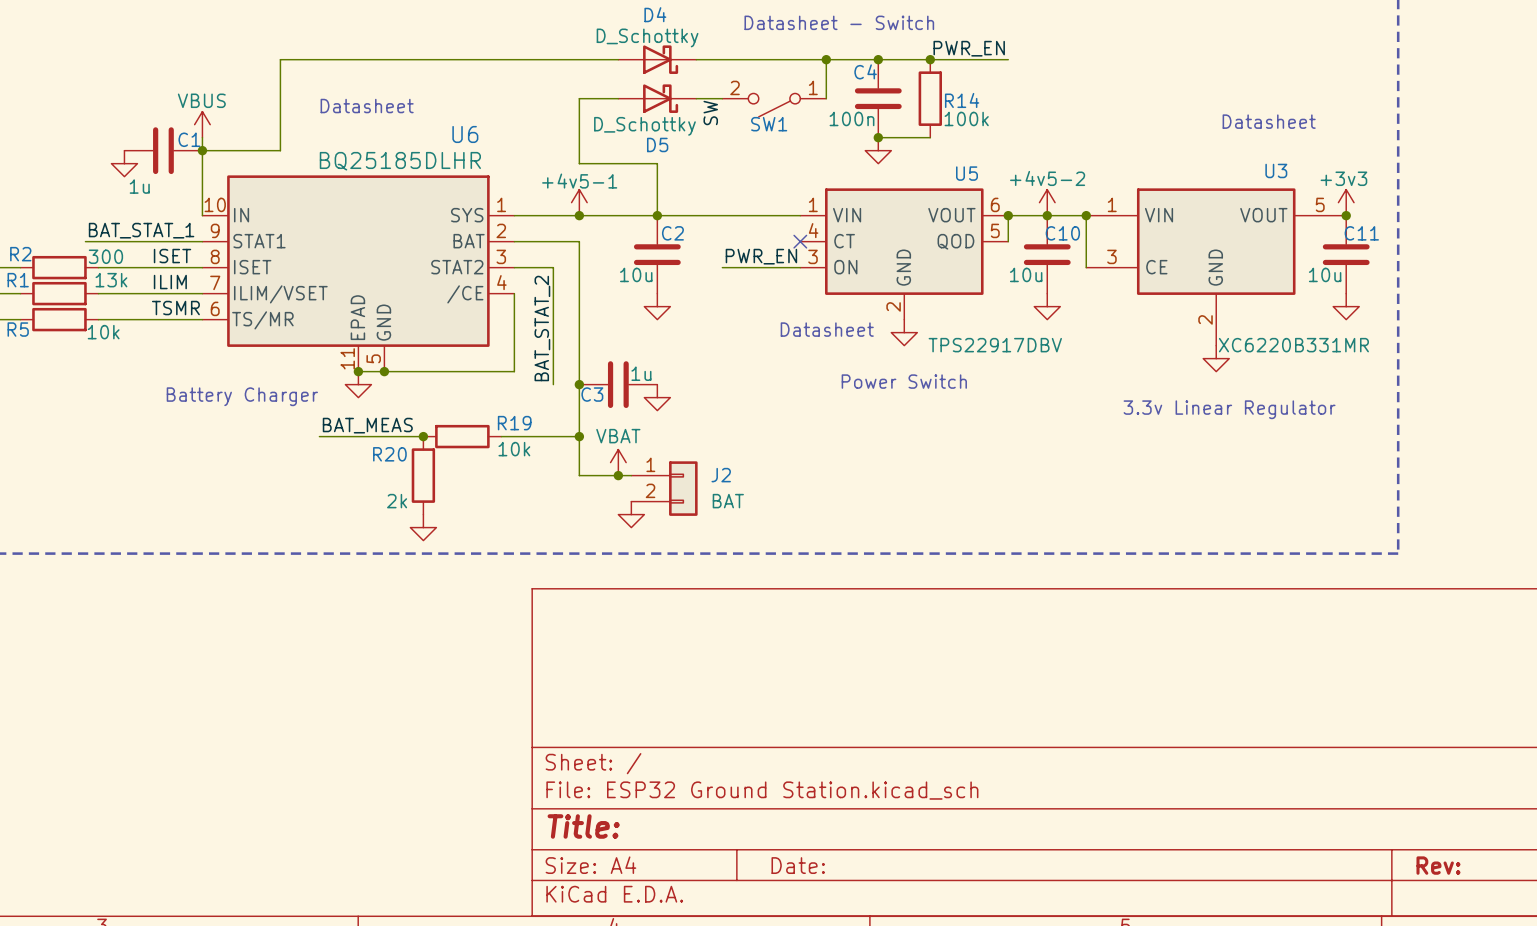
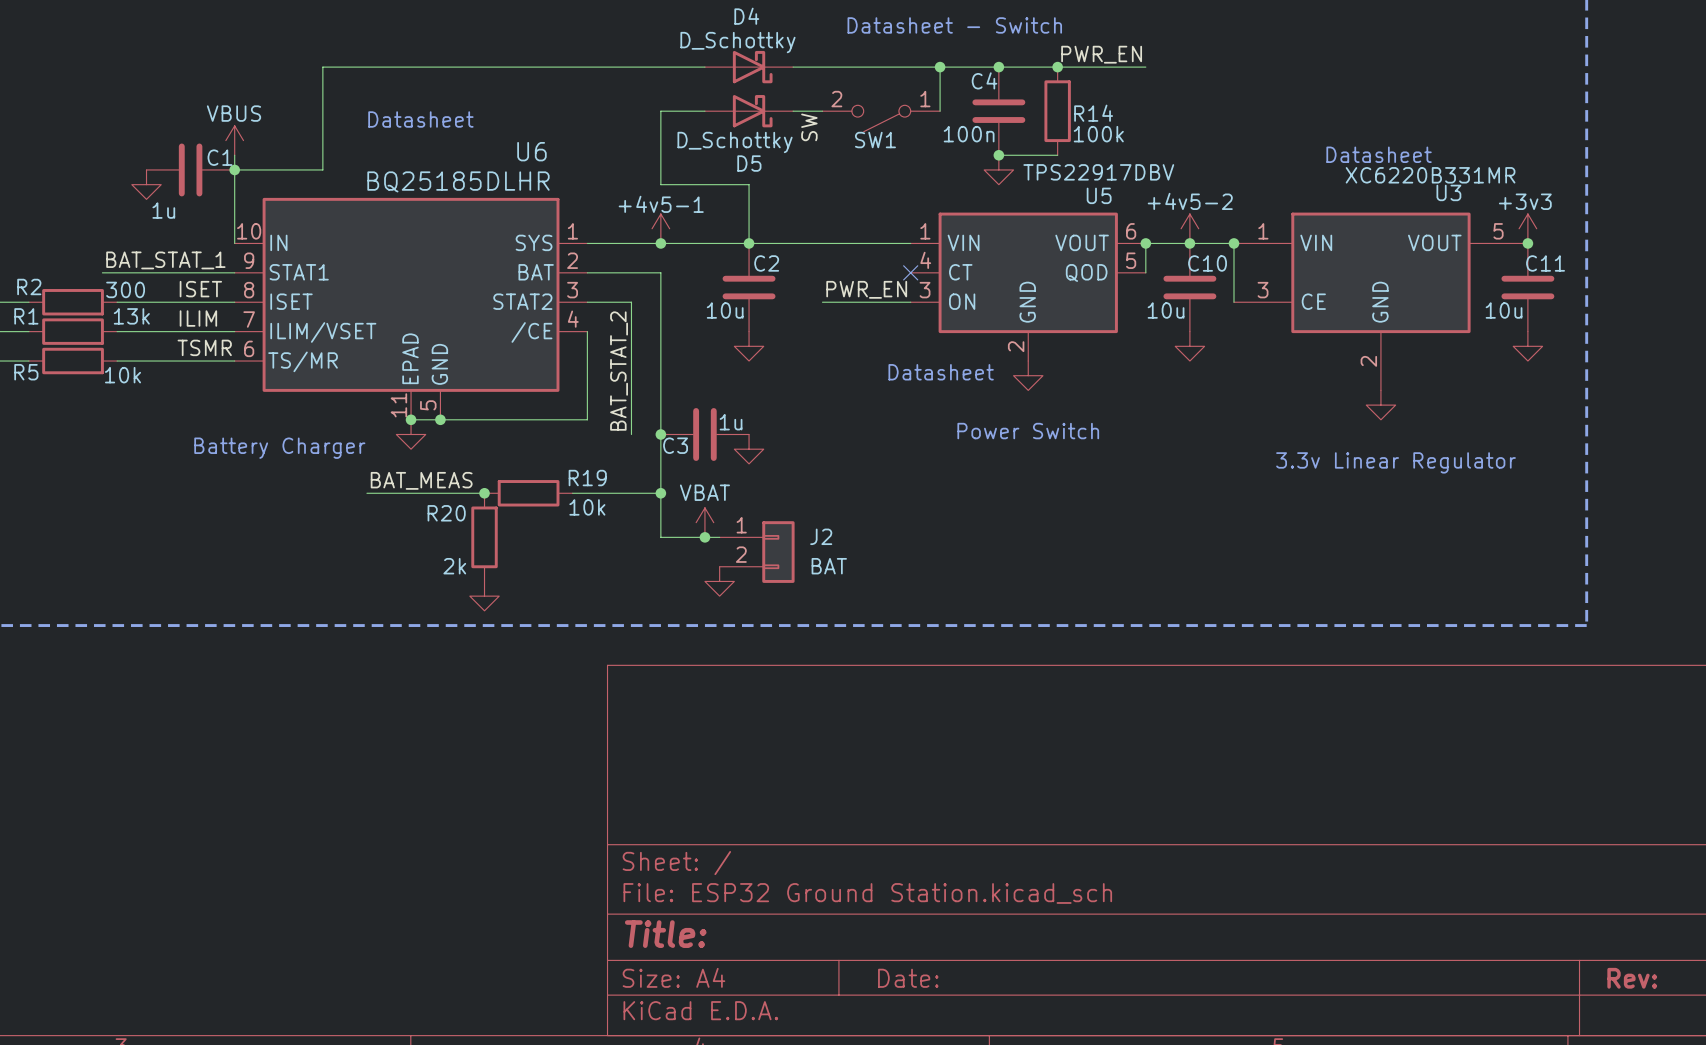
text position: Datasheet (1269, 121) -> Datasheet (1379, 154)
U5 value position: TPS22917DBV (995, 345) -> TPS22917DBV (1098, 172)
U3 value position: XC6220B331MR (1293, 345) -> XC6220B331MR (1430, 175)

